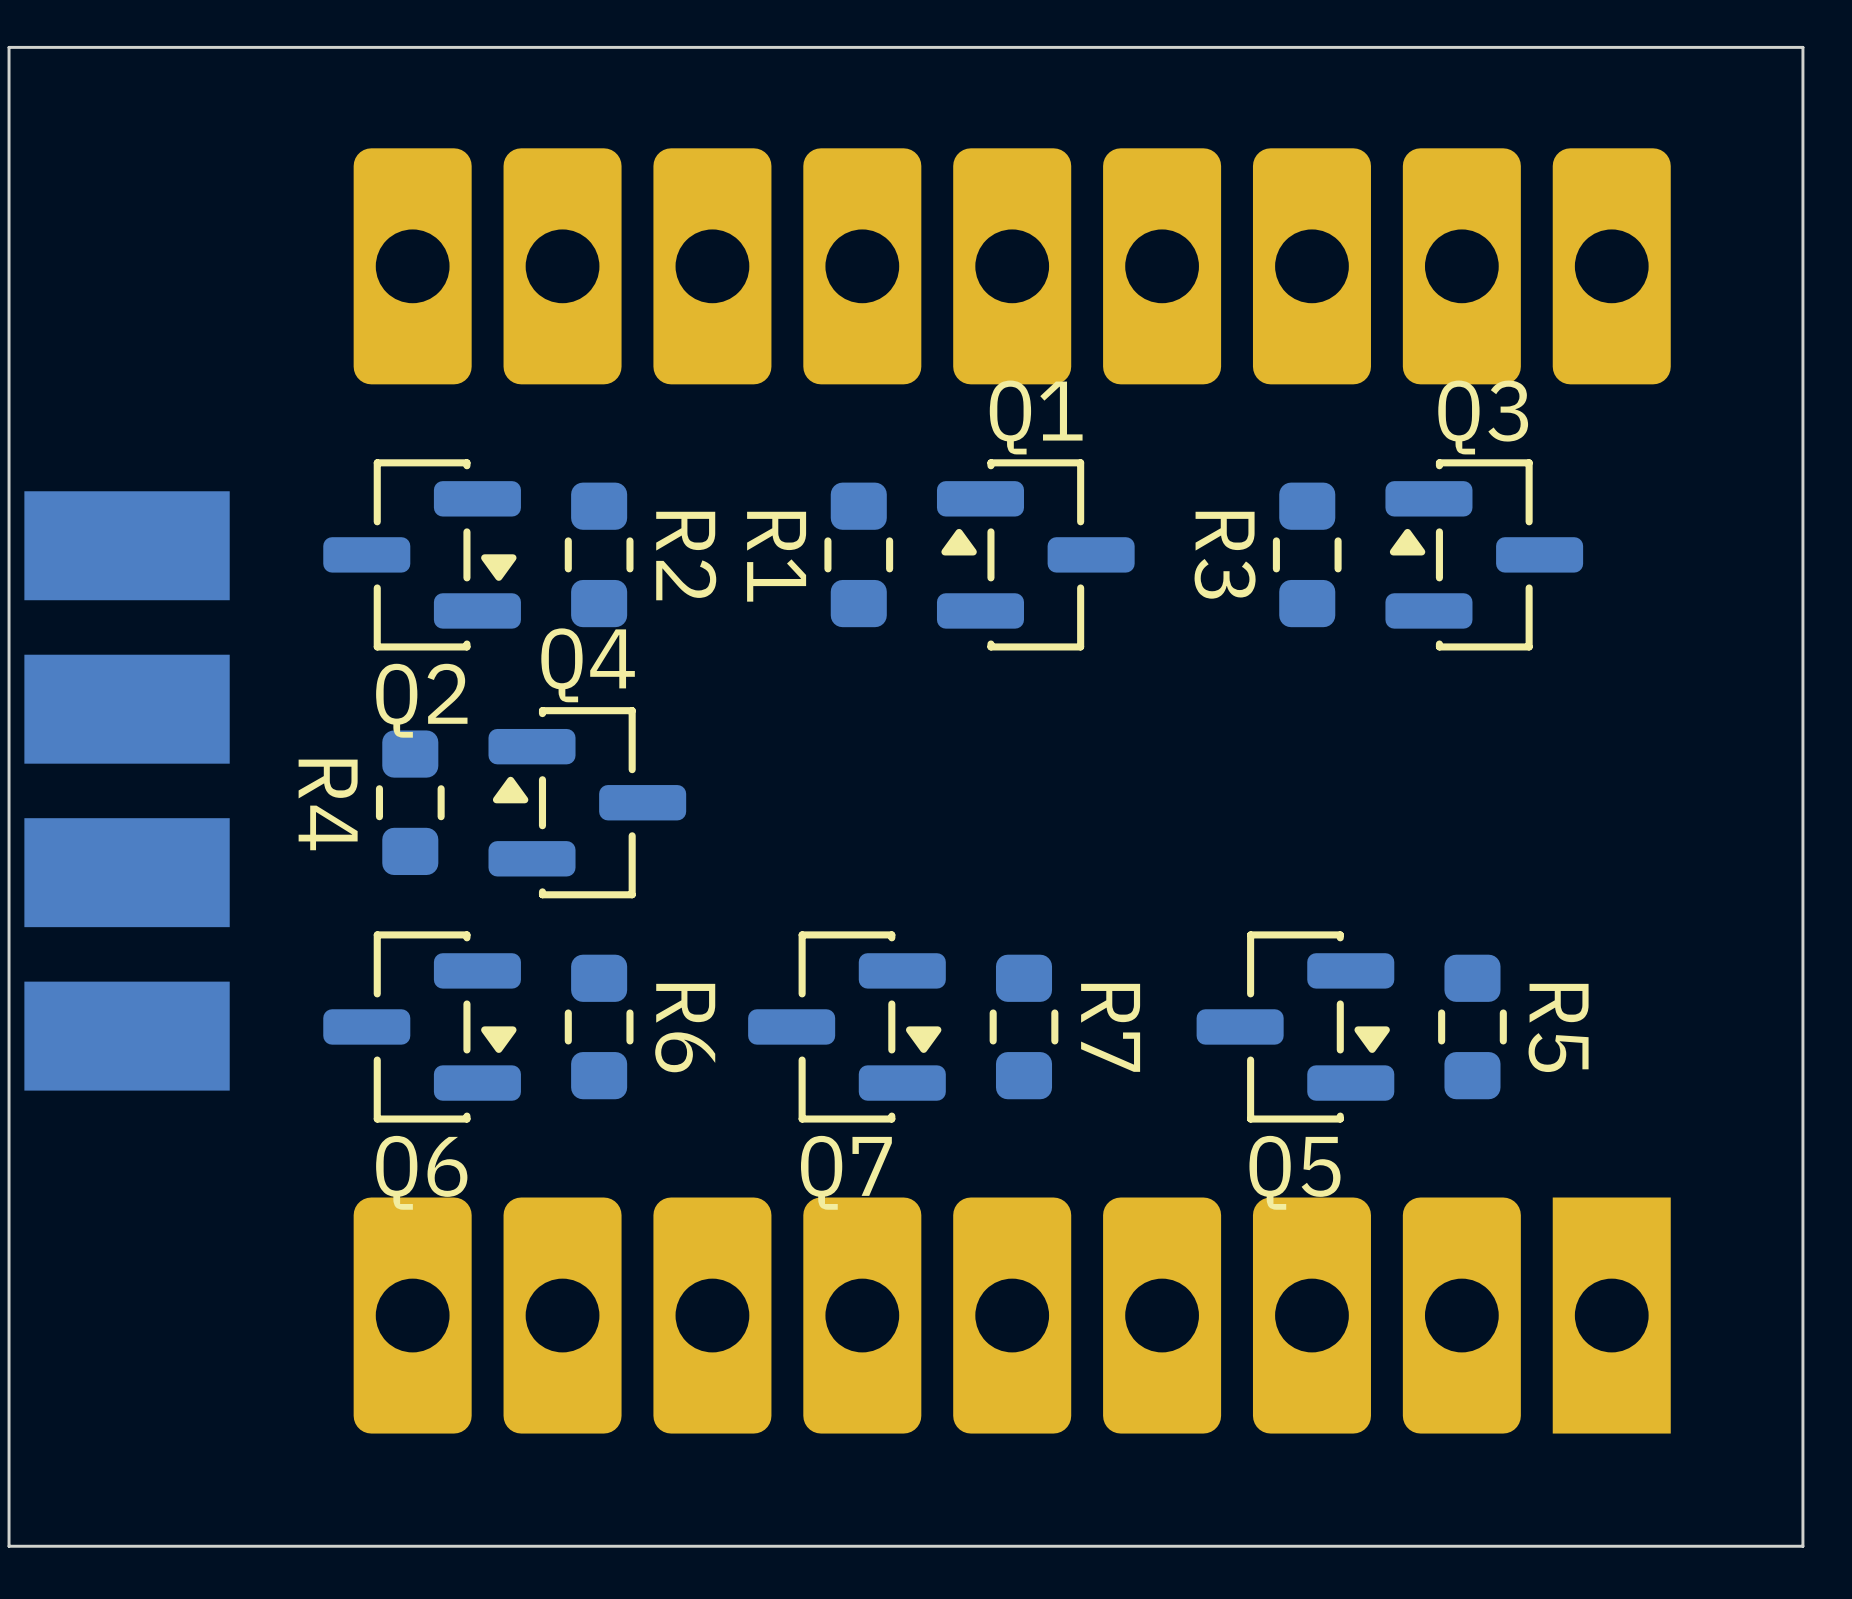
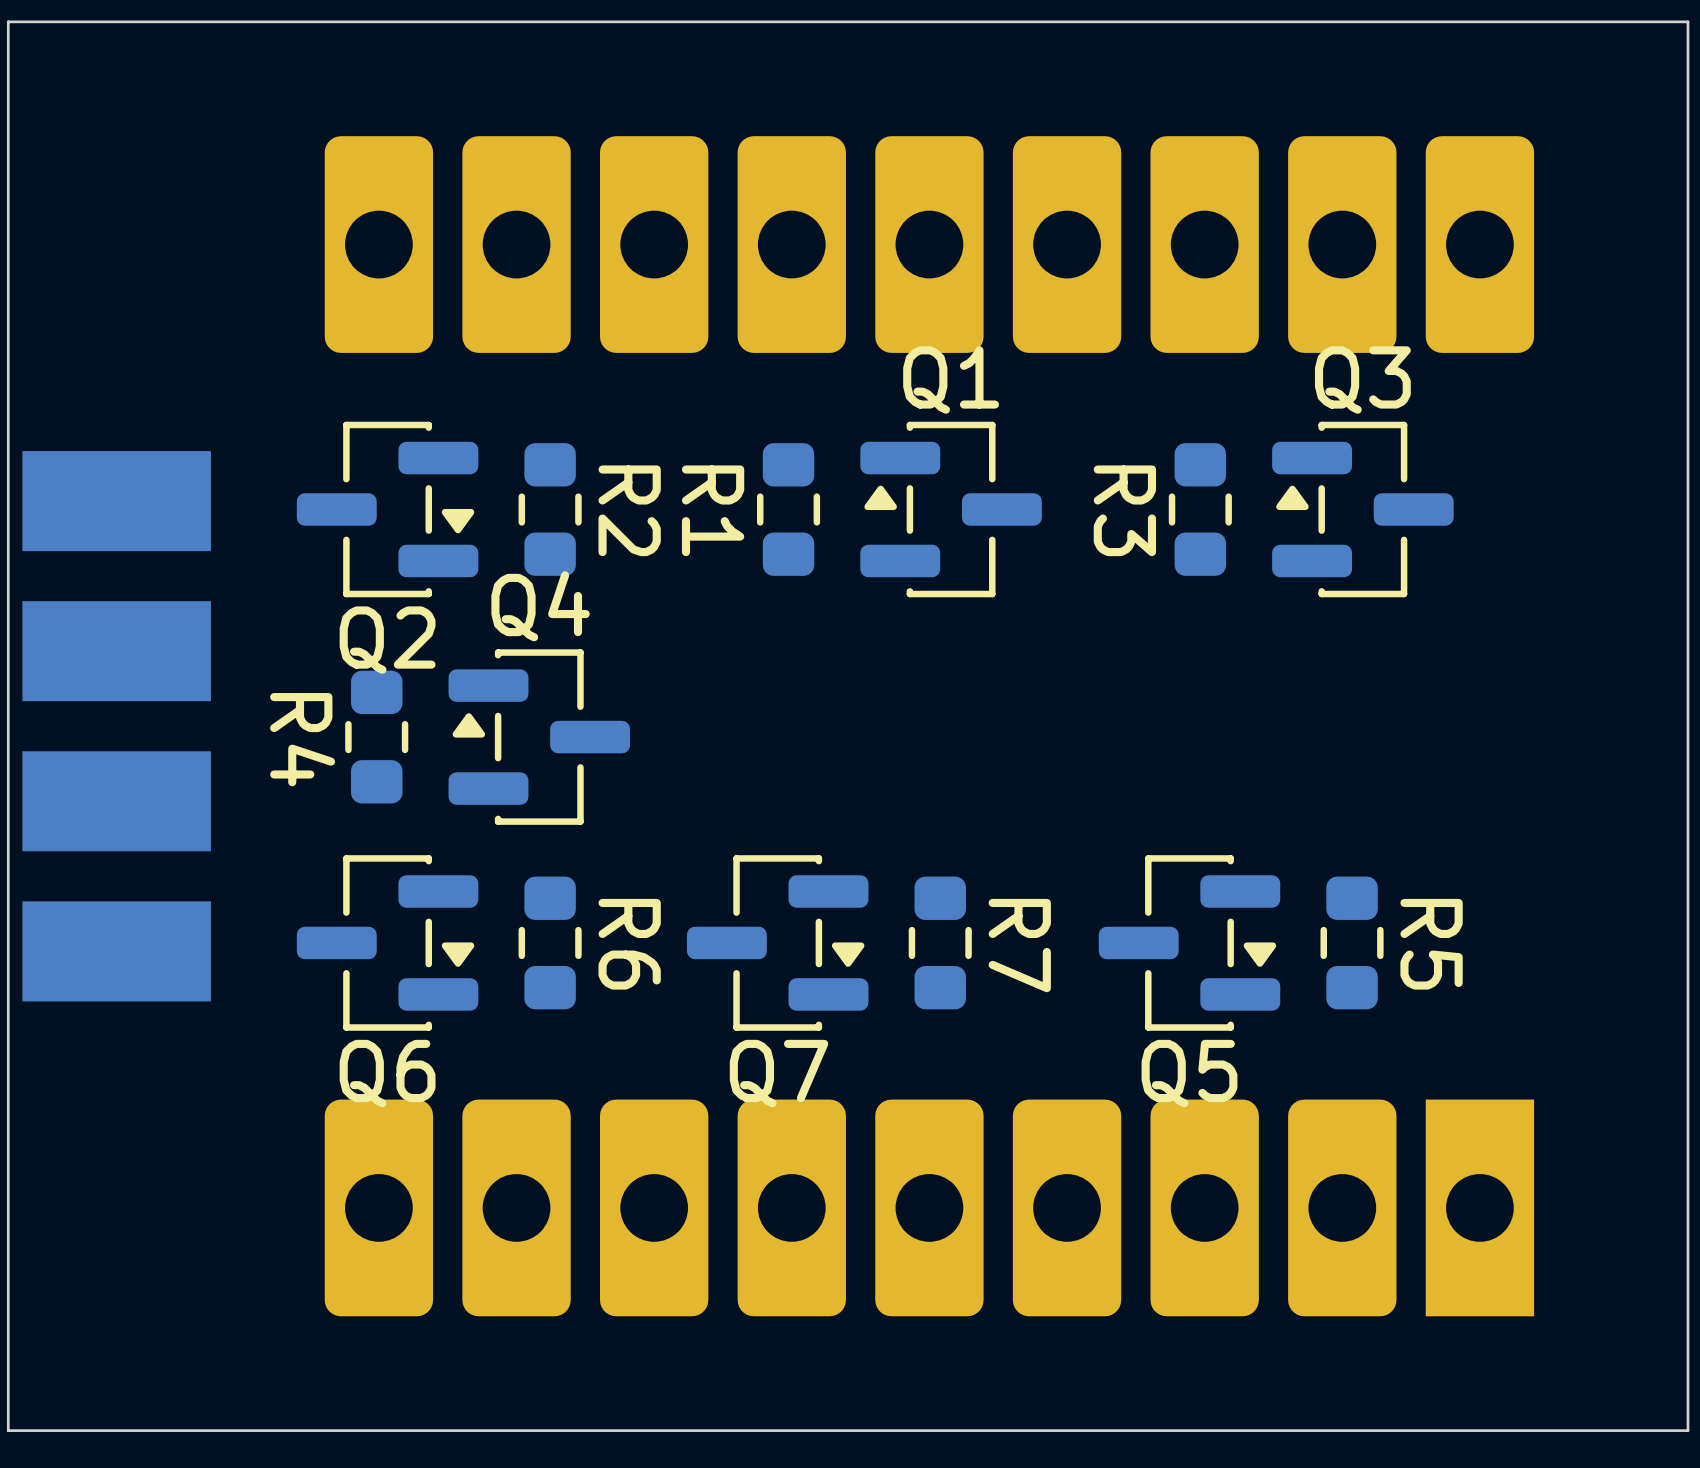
board edge: (9, 47) (1802, 47) (1802, 1546) (9, 1546) -> (8, 43) (8, 21) (1687, 21) (1687, 1430) (8, 1430) (8, 1419)

